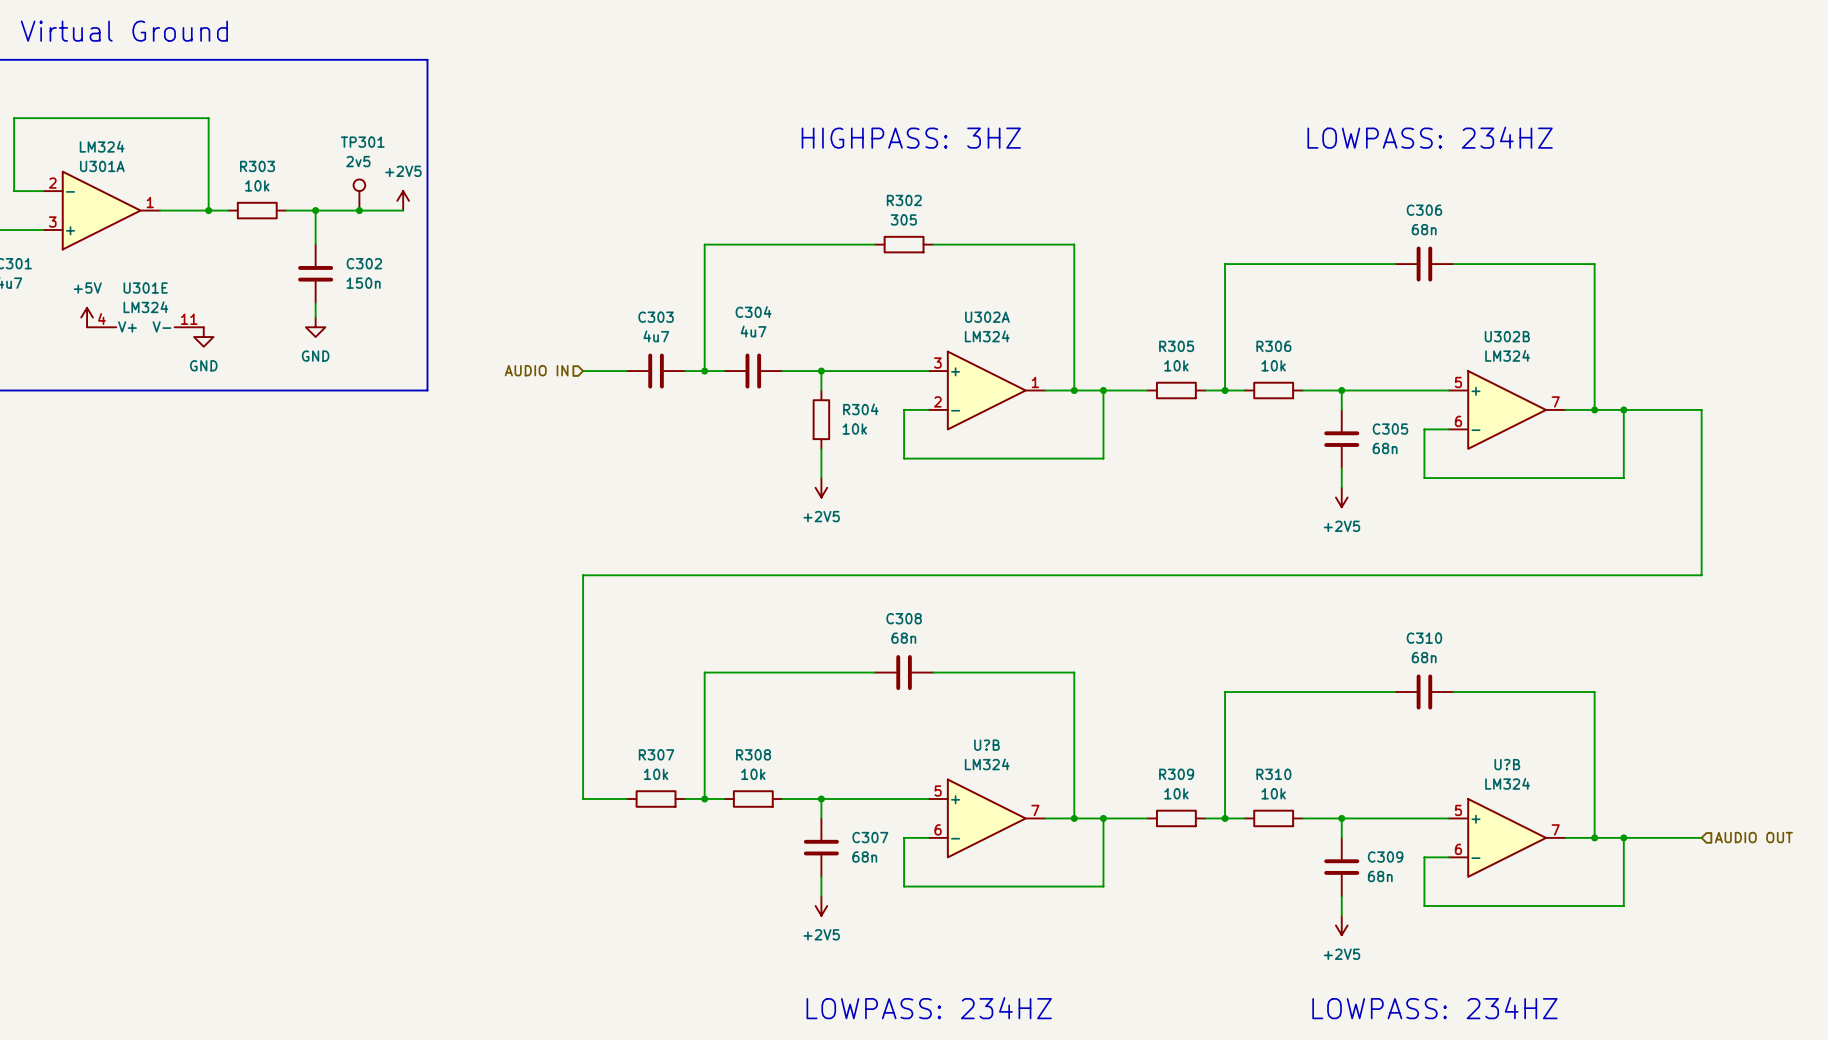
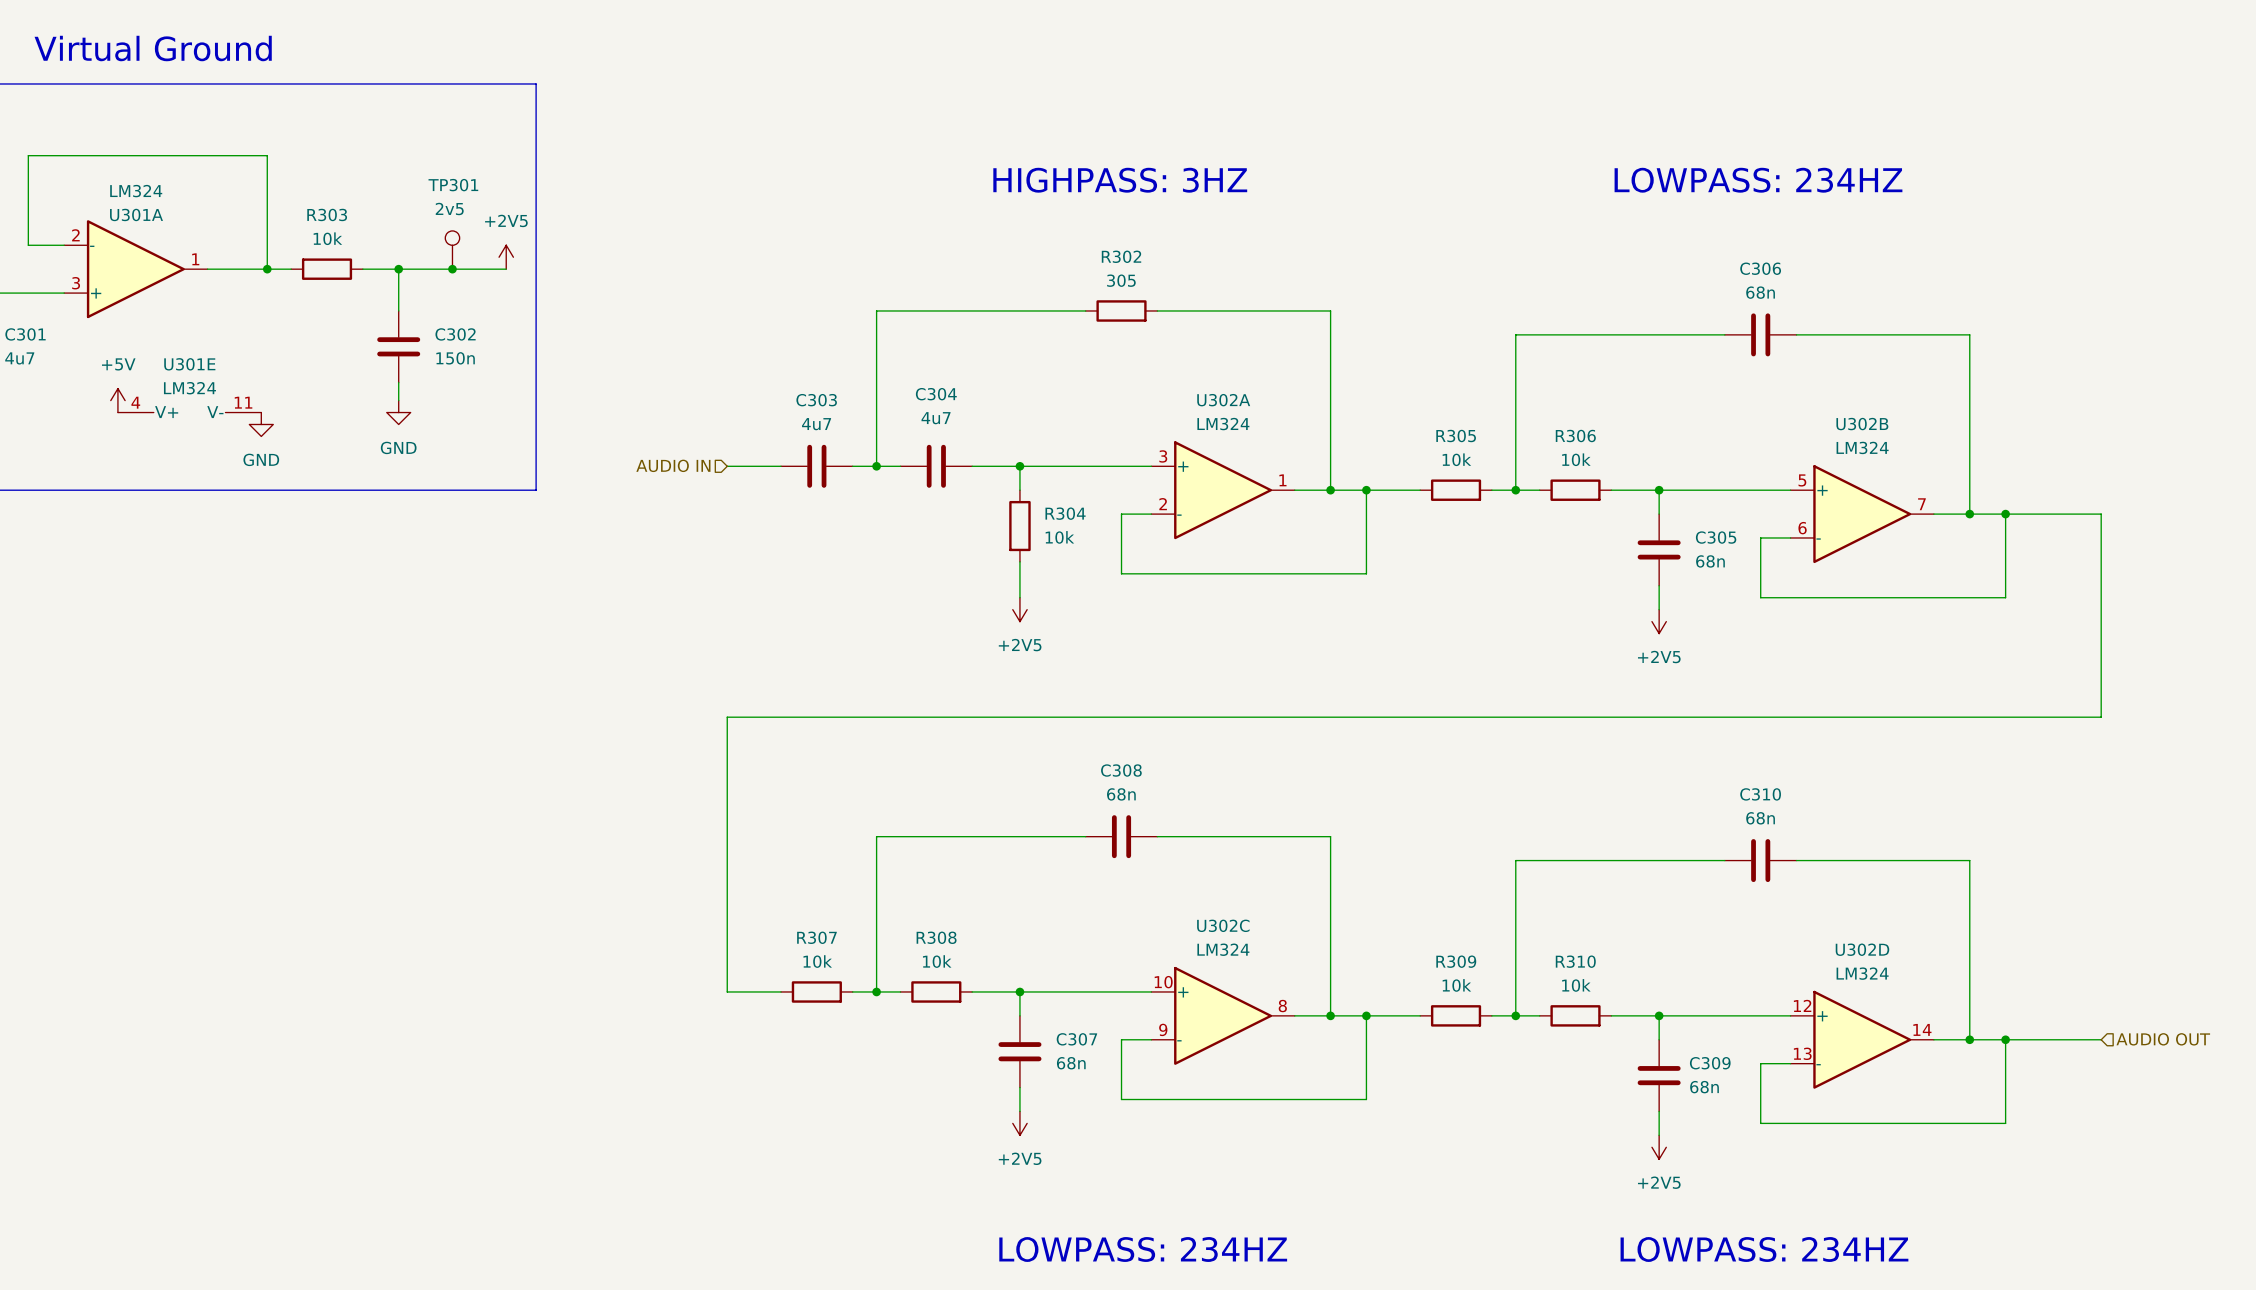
U?B name: U?B (986, 745) -> U302C (1223, 925)
U?B name: U?B (1507, 764) -> U302D (1862, 949)
U?B pin number: 5 (938, 790) -> 10 (1163, 982)
U?B pin number: 7 (1035, 810) -> 8 (1282, 1006)
U?B pin number: 5 (1458, 810) -> 12 (1802, 1005)
U?B pin number: 6 (938, 829) -> 9 (1163, 1029)
U?B pin number: 7 (1555, 829) -> 14 (1922, 1029)
U?B pin number: 6 (1458, 849) -> 13 (1802, 1053)

